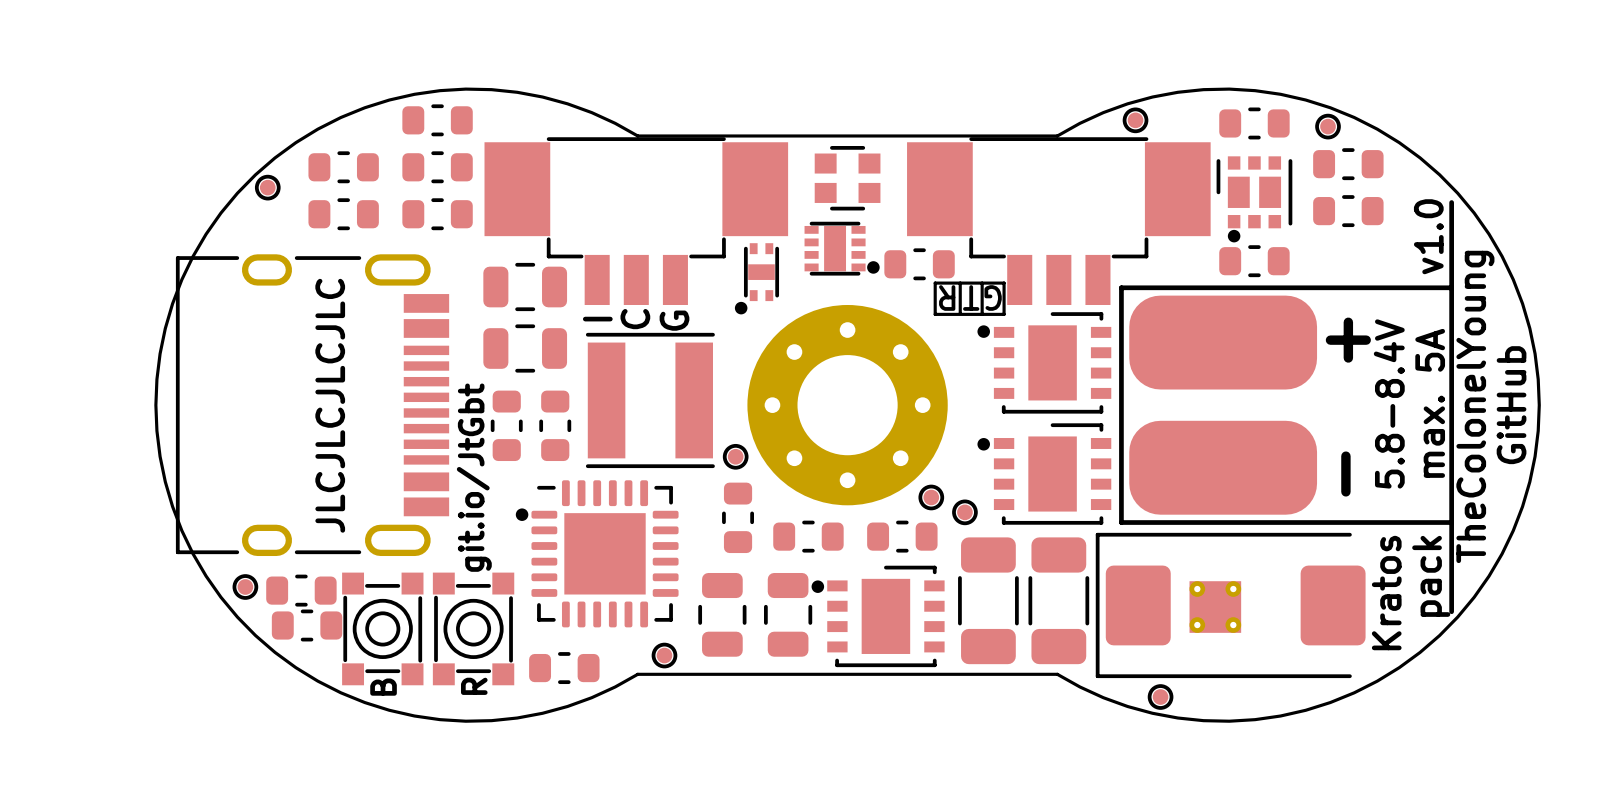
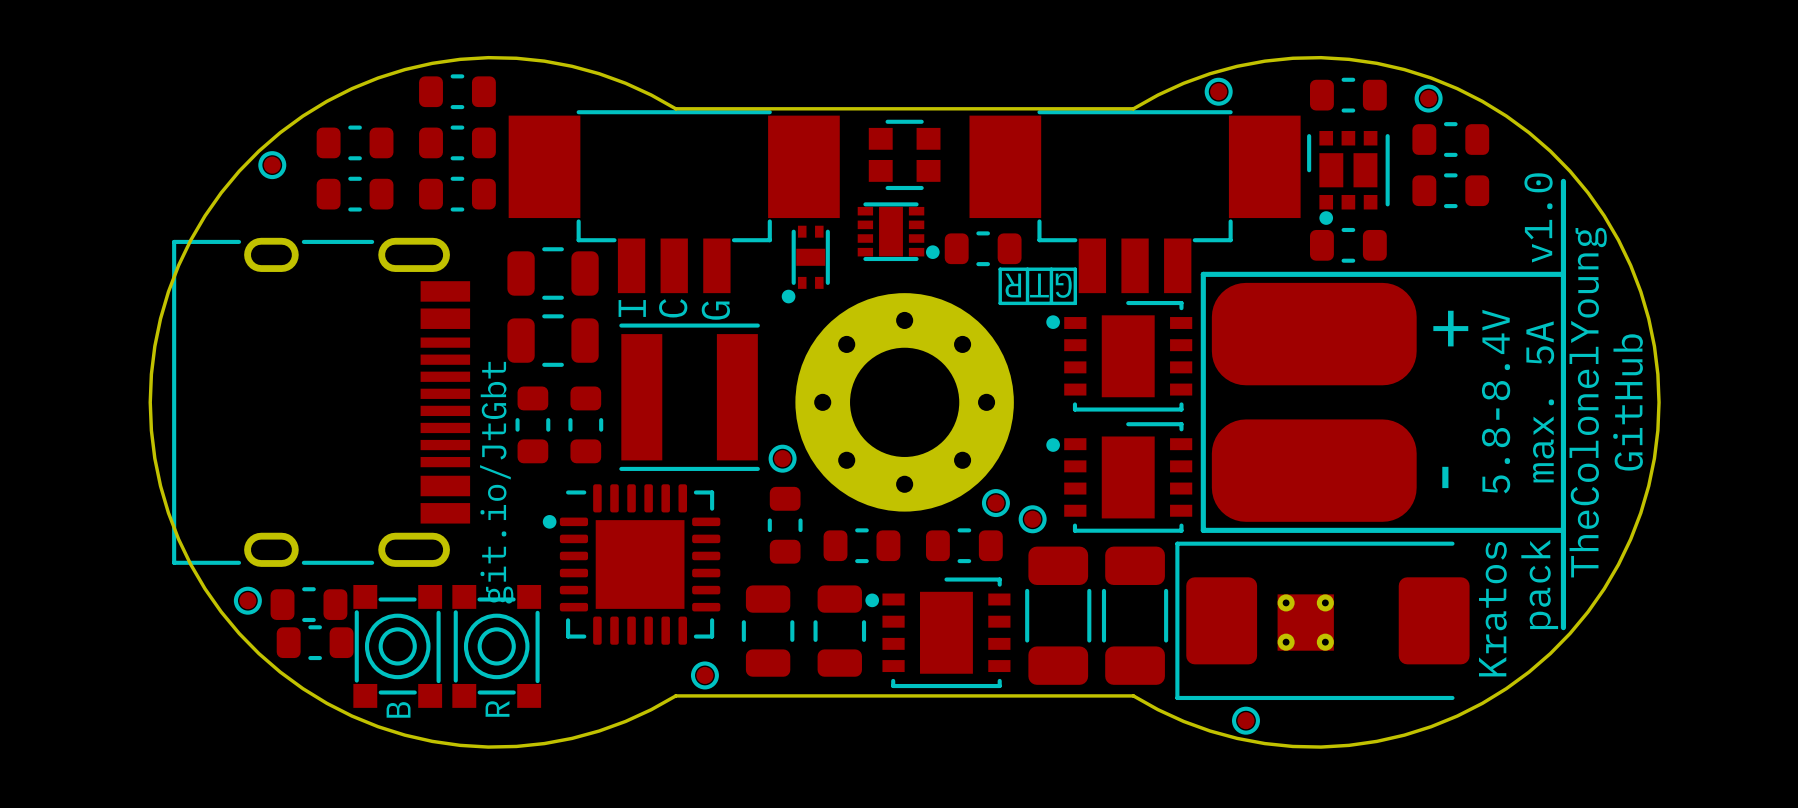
text: JLCJLCJLCJLC (330, 405) -> none
part: (564, 668) -> none

